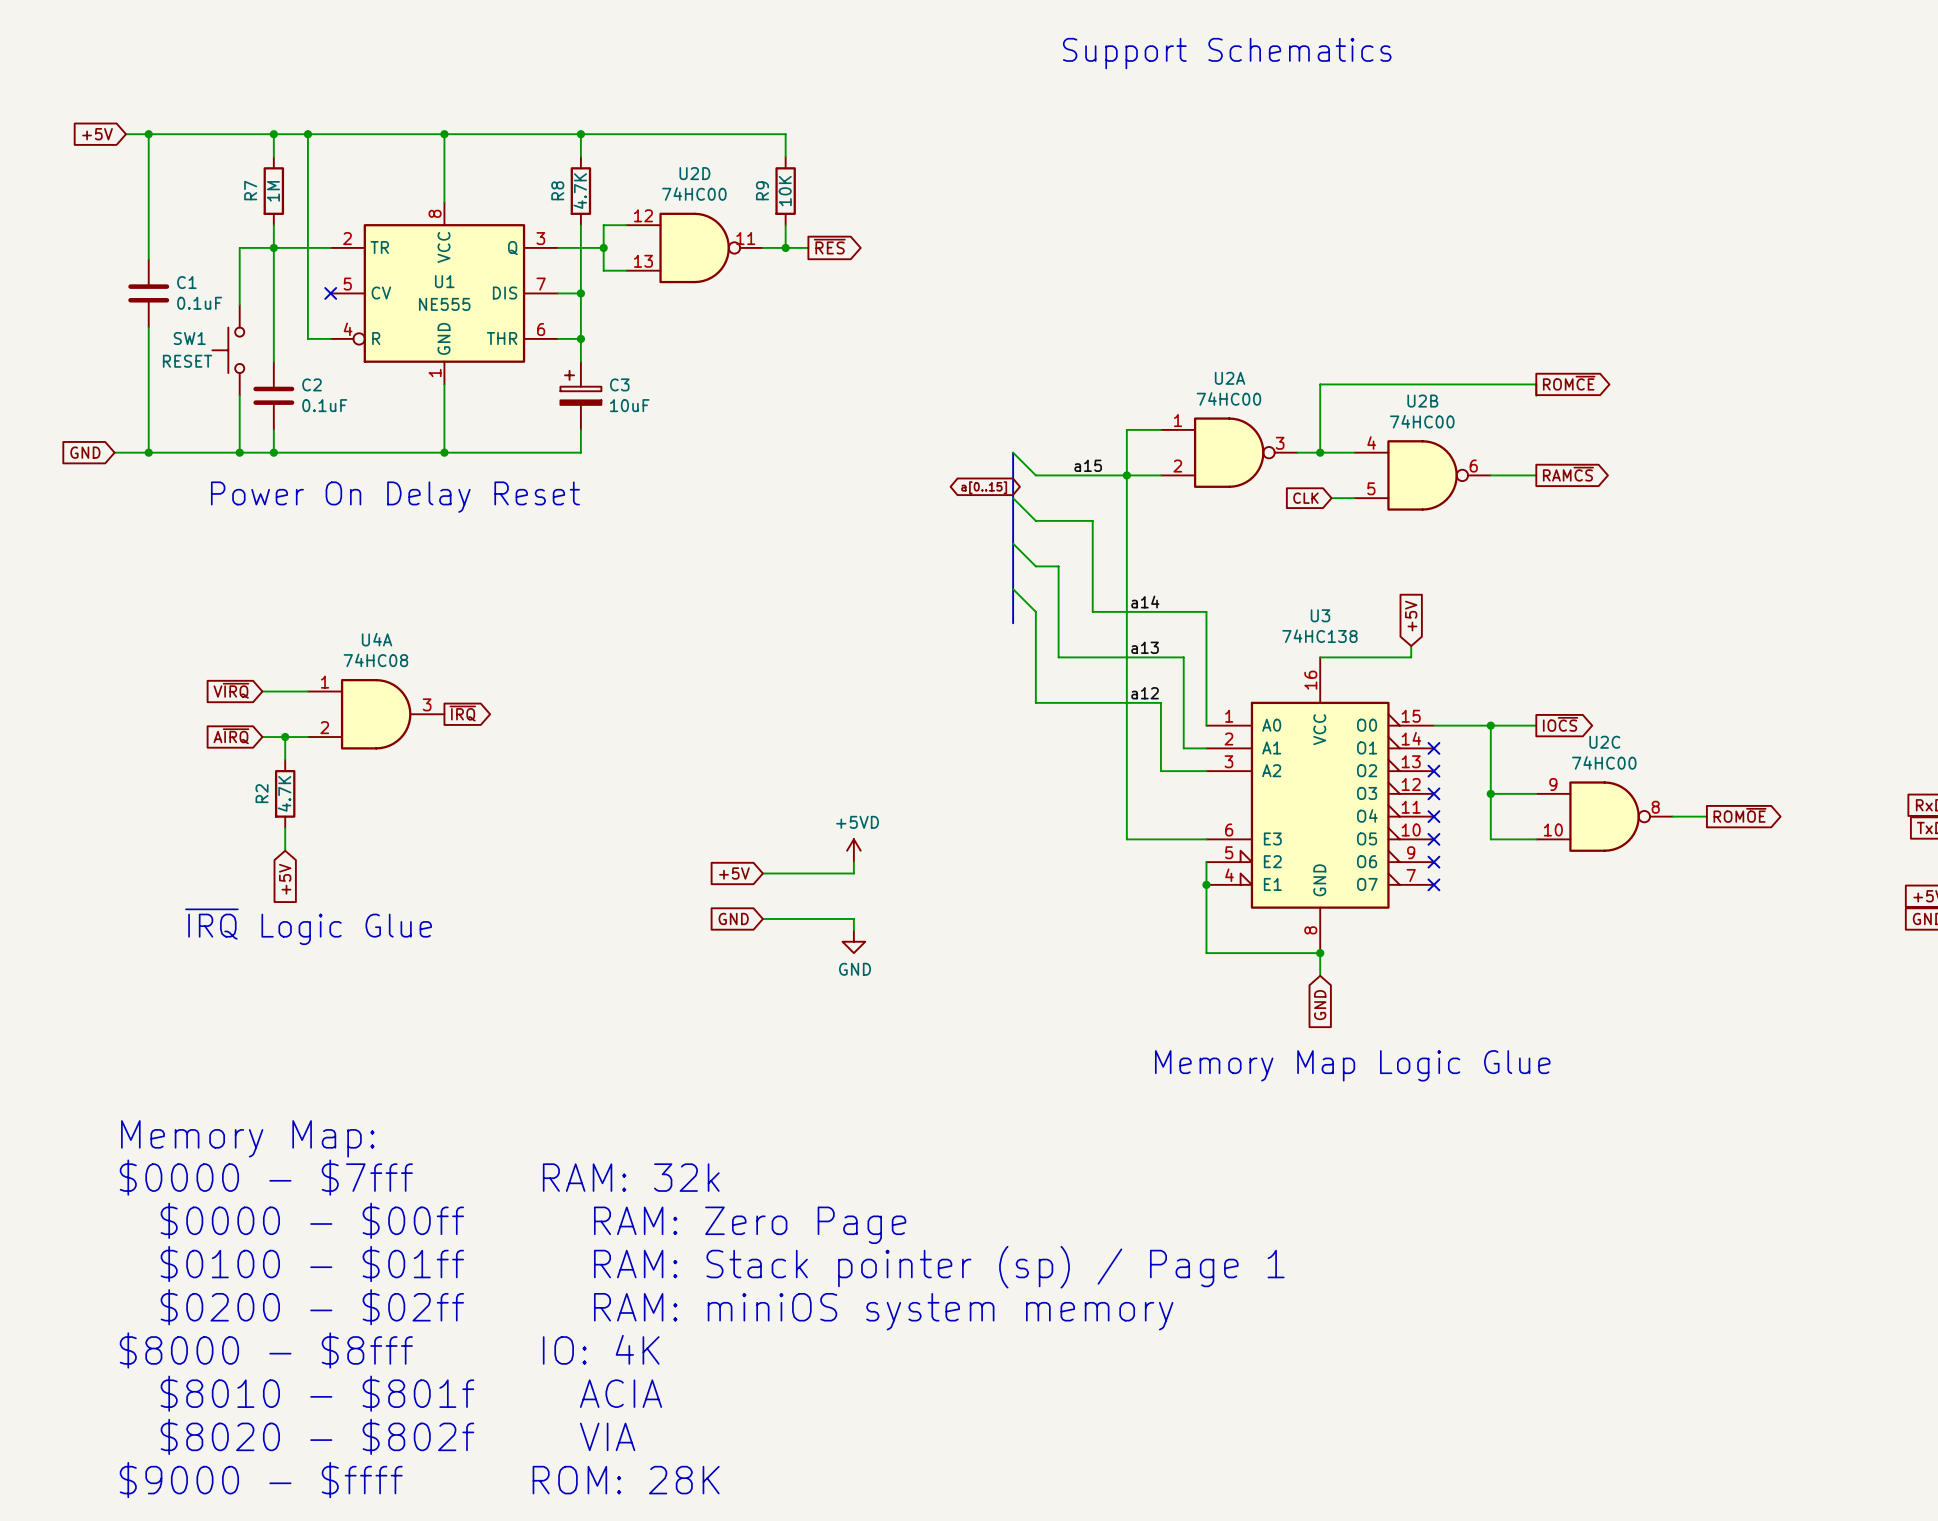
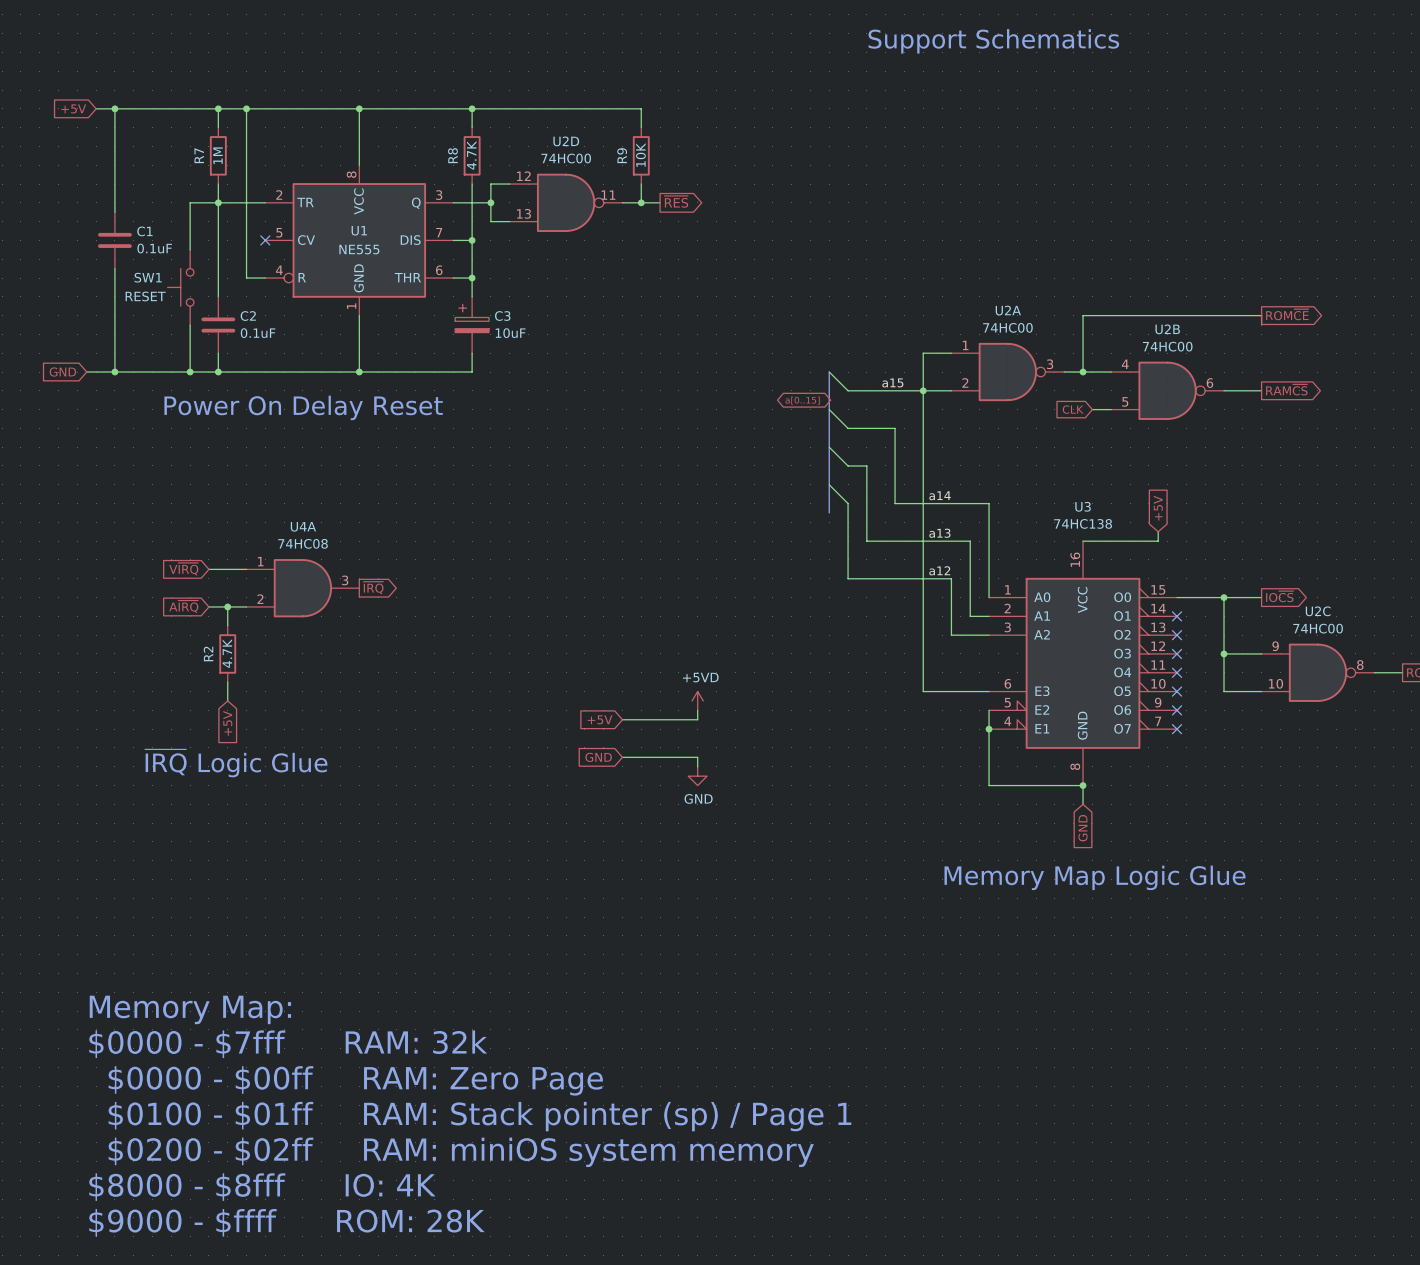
text: Memory Map: (247, 1138) -> none
text: $0000 - $7fff RAM: 32k (419, 1177) -> none
text: $0000 - $00ff RAM: Zero Page (533, 1223) -> Memory Map: (190, 1009)
text: $0100 - $01ff RAM: Stack pointer (sp) / Page 1 (722, 1267) -> $0000 - $7fff RAM: 32k (288, 1044)
text: $0200 - $02ff RAM: miniOS system memory (667, 1309) -> $0000 - $00ff RAM: Zero Page (355, 1080)
text: $8000 - $8fff IO: 4K (389, 1350) -> $0100 - $01ff RAM: Stack pointer (sp) / Page 1 (479, 1116)
text: $8010 - $801f ACIA (411, 1393) -> $0200 - $02ff RAM: miniOS system memory (461, 1152)
text: $8020 - $802f VIA (397, 1436) -> $8000 - $8fff IO: 4K (262, 1187)

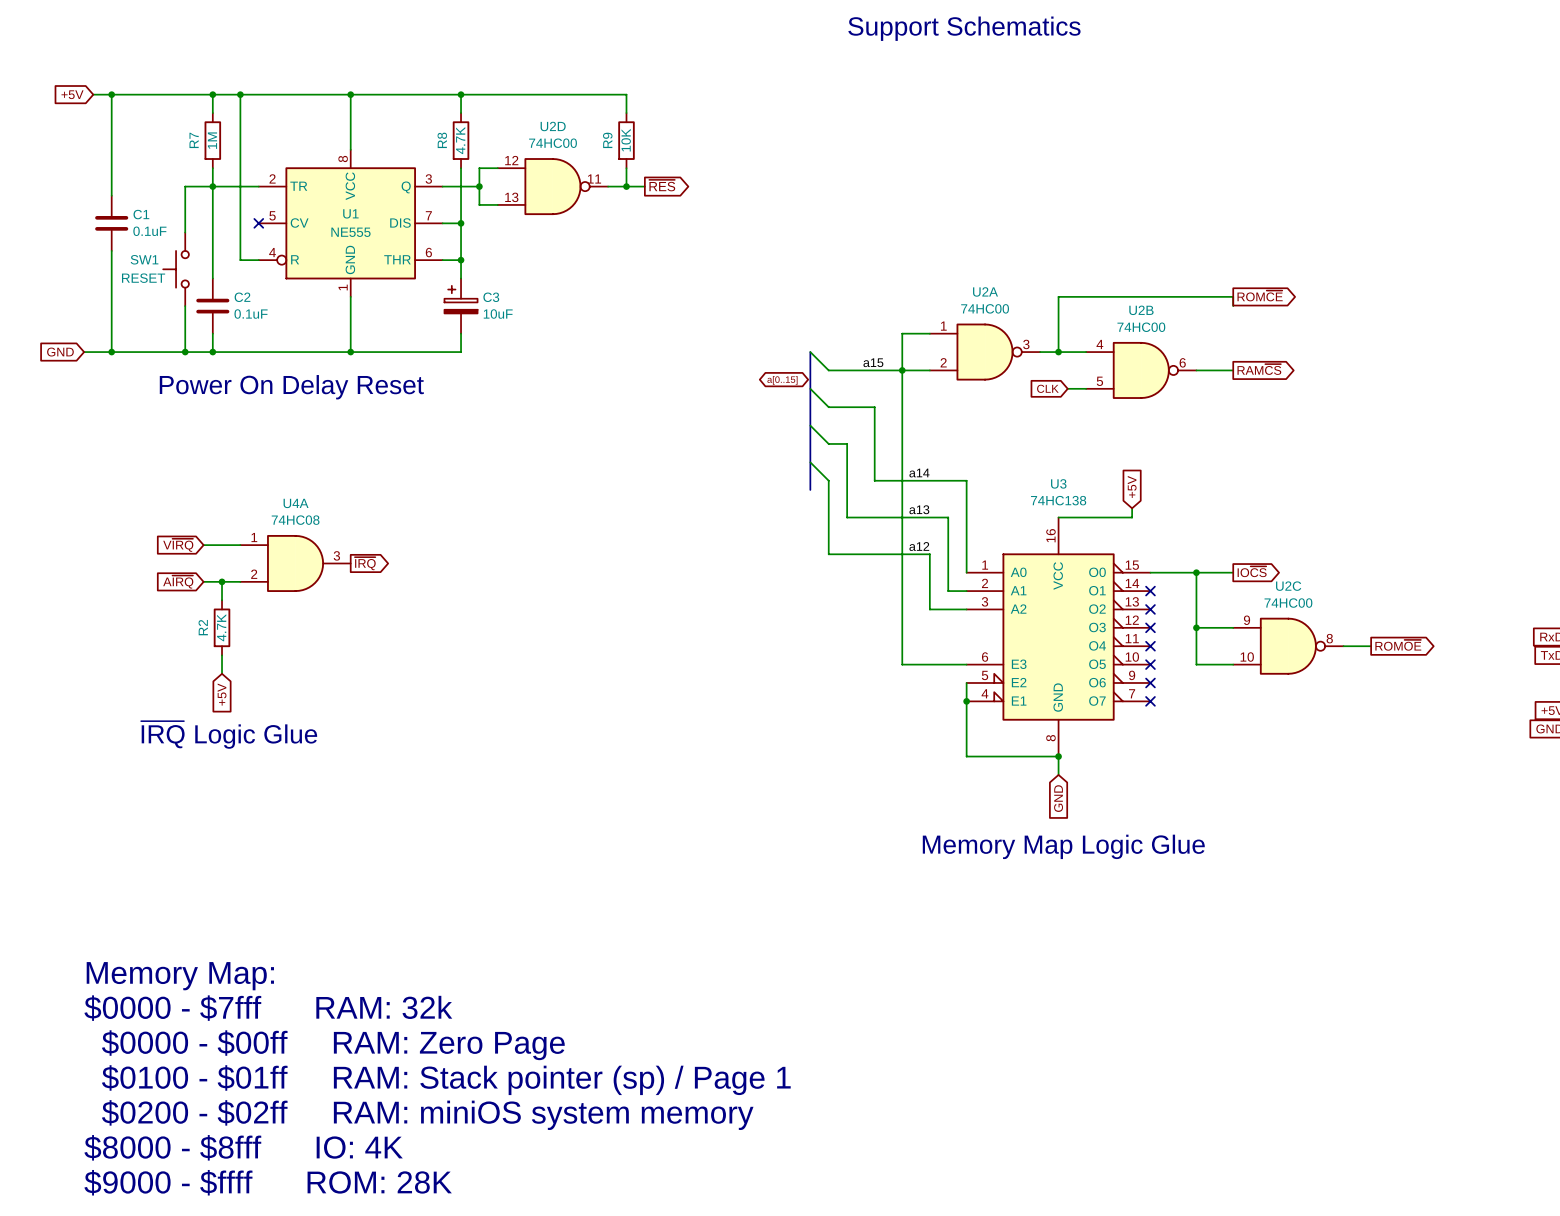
power symbol: +5VD (697, 700) -> none
wire: (697, 710) (697, 719) (622, 719) -> none
global label: +5V (600, 719) -> none
global label: GND (598, 757) -> none
wire: (622, 757) (697, 757) (697, 766) -> none
power symbol: GND (697, 776) -> none

